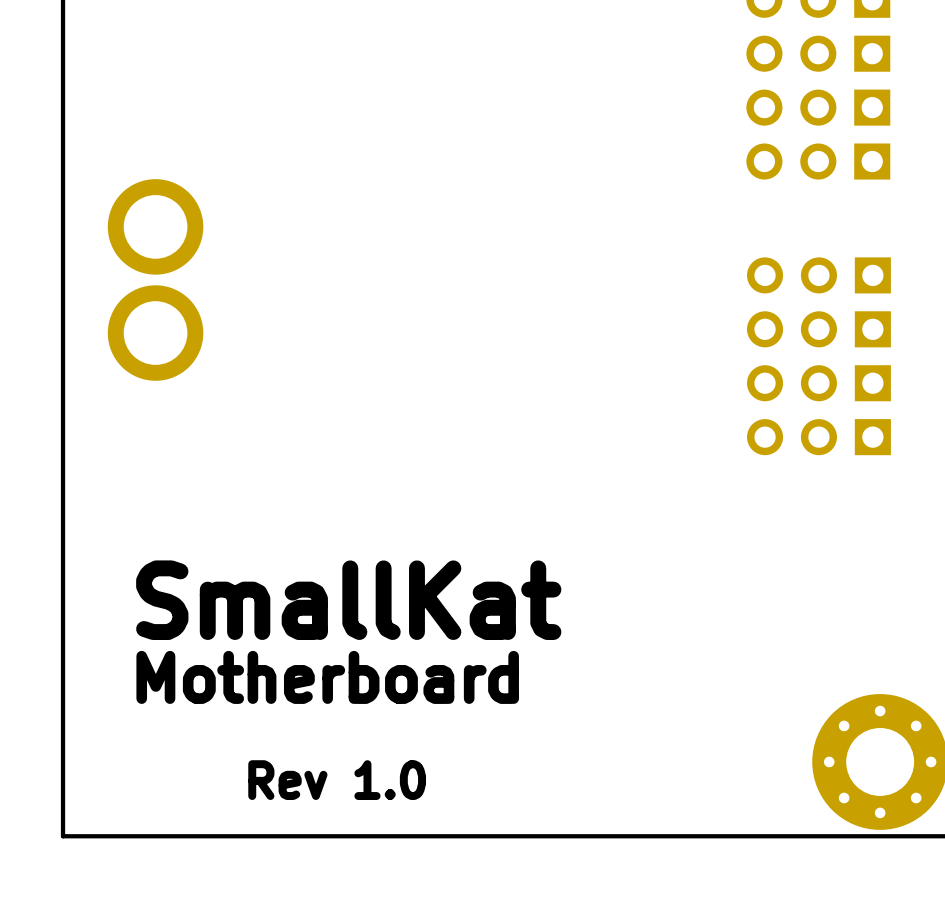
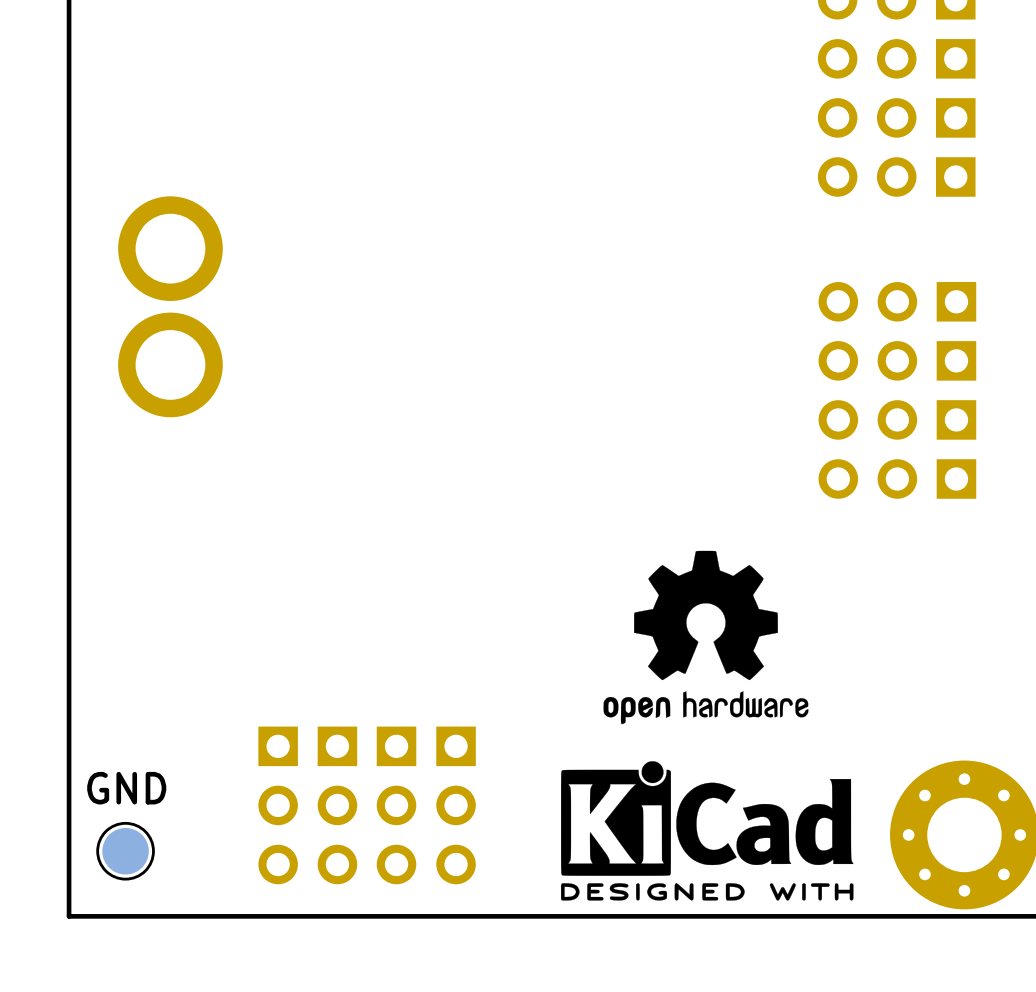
drawing: none -> [603, 550, 809, 725]
text: SmallKat (348, 600) -> none
text: Motherboard (327, 677) -> none
drawing: none -> [560, 761, 854, 901]
text: none -> GND (126, 788)
part: none -> (278, 805)
part: none -> (337, 805)
part: none -> (396, 805)
part: none -> (456, 805)
part: none -> (125, 851)
text: Rev 1.0 (337, 780) -> none

